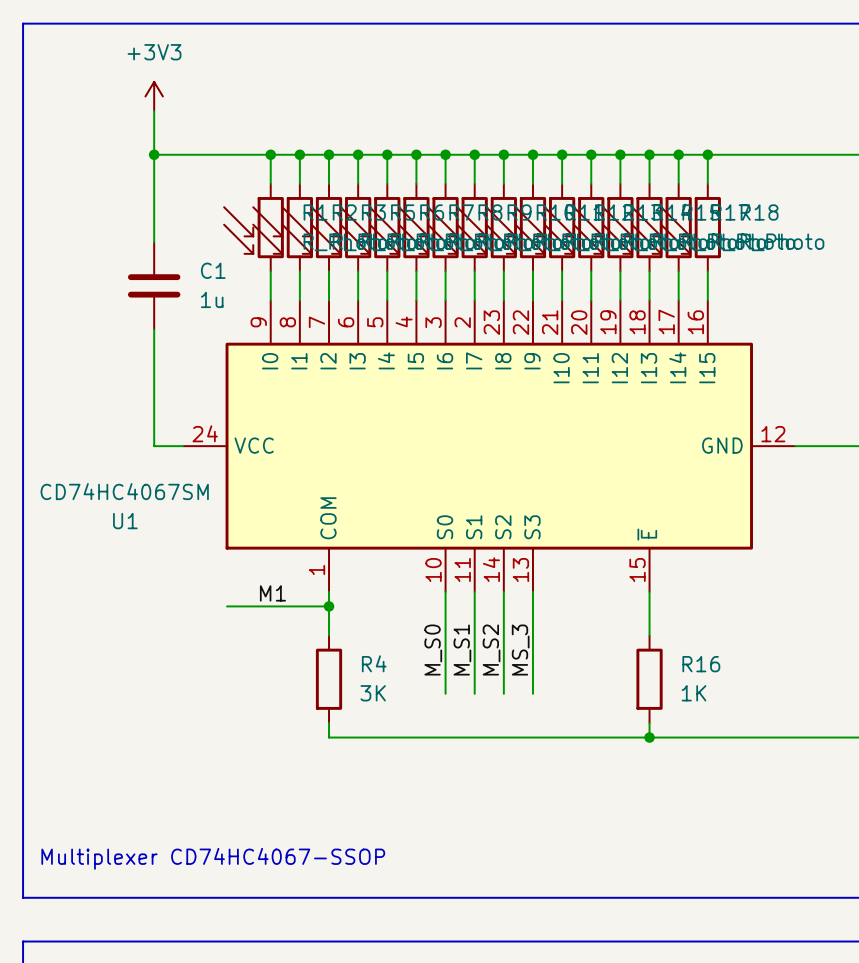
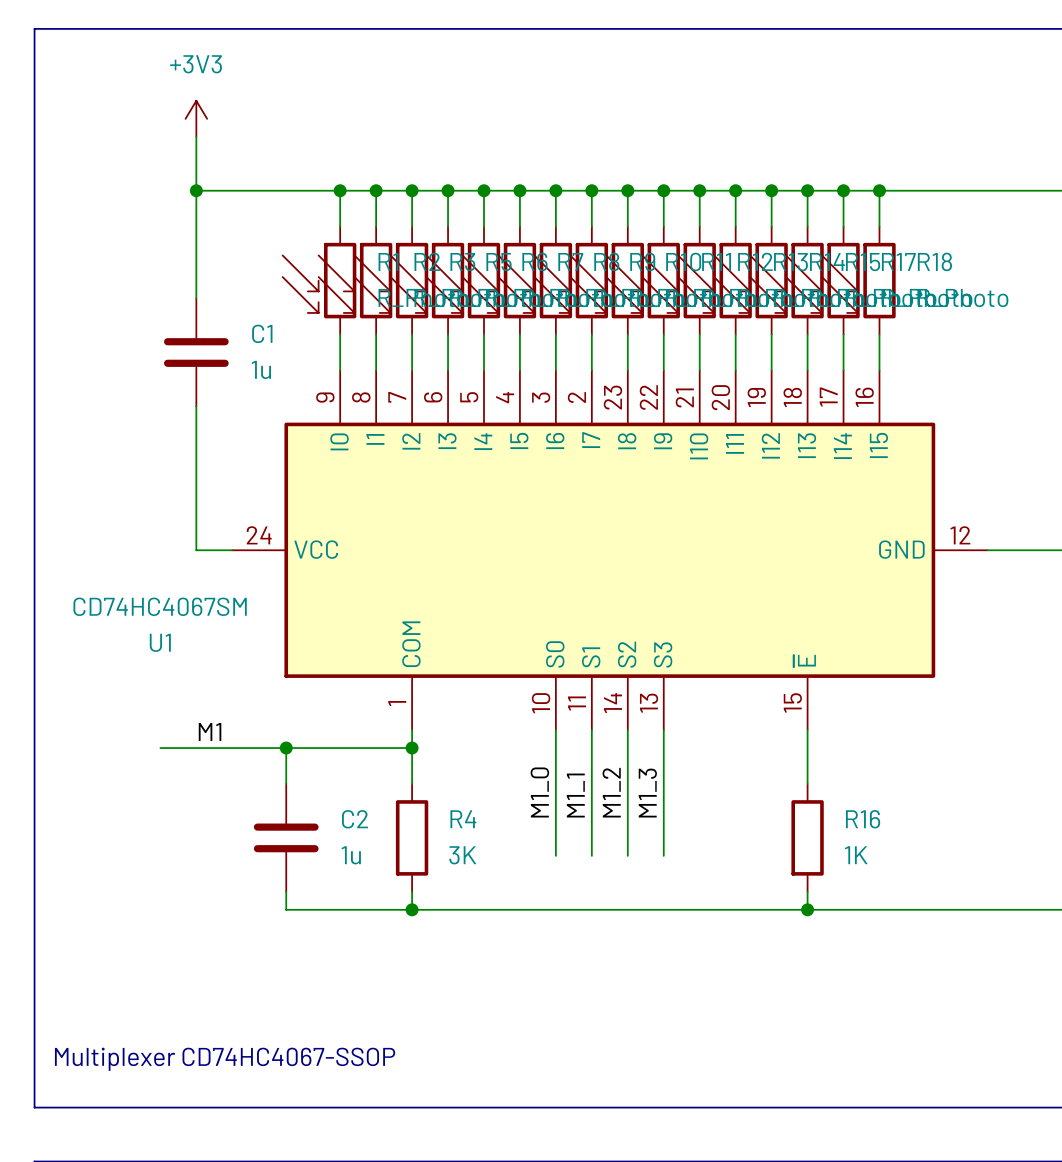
label position: M1 (272, 593) -> M1 (210, 731)
wire: none -> (160, 748) (286, 748) (286, 783)
junction: none -> (286, 748)
label: M_S0 (433, 650) -> M1_0 (539, 792)
label: M_S1 (462, 650) -> M1_1 (575, 795)
label: M_S2 (491, 650) -> M1_2 (611, 792)
label: MS_3 (520, 650) -> M1_3 (647, 793)
C2: none -> 1u (286, 837)
wire: none -> (286, 891) (286, 909) (412, 909)
junction: none -> (412, 909)

